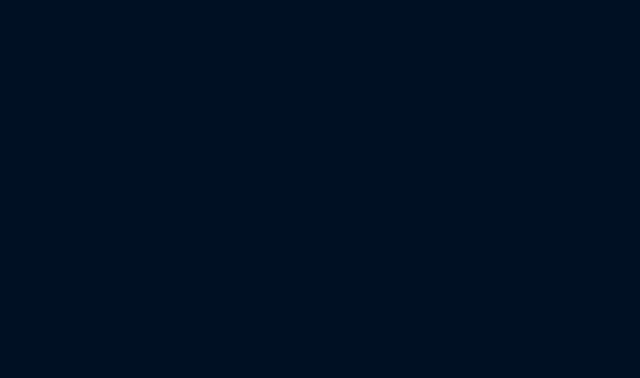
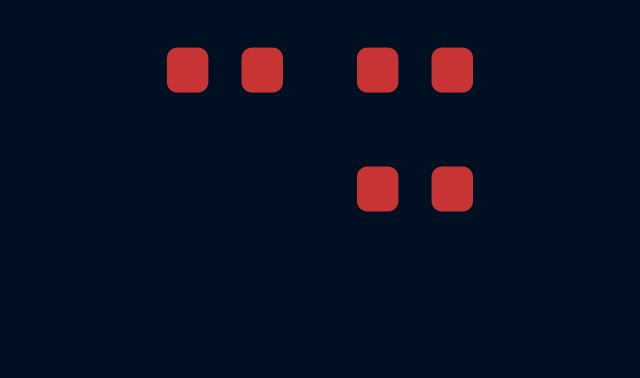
part: none -> (224, 70)
part: none -> (414, 70)
part: none -> (414, 189)

